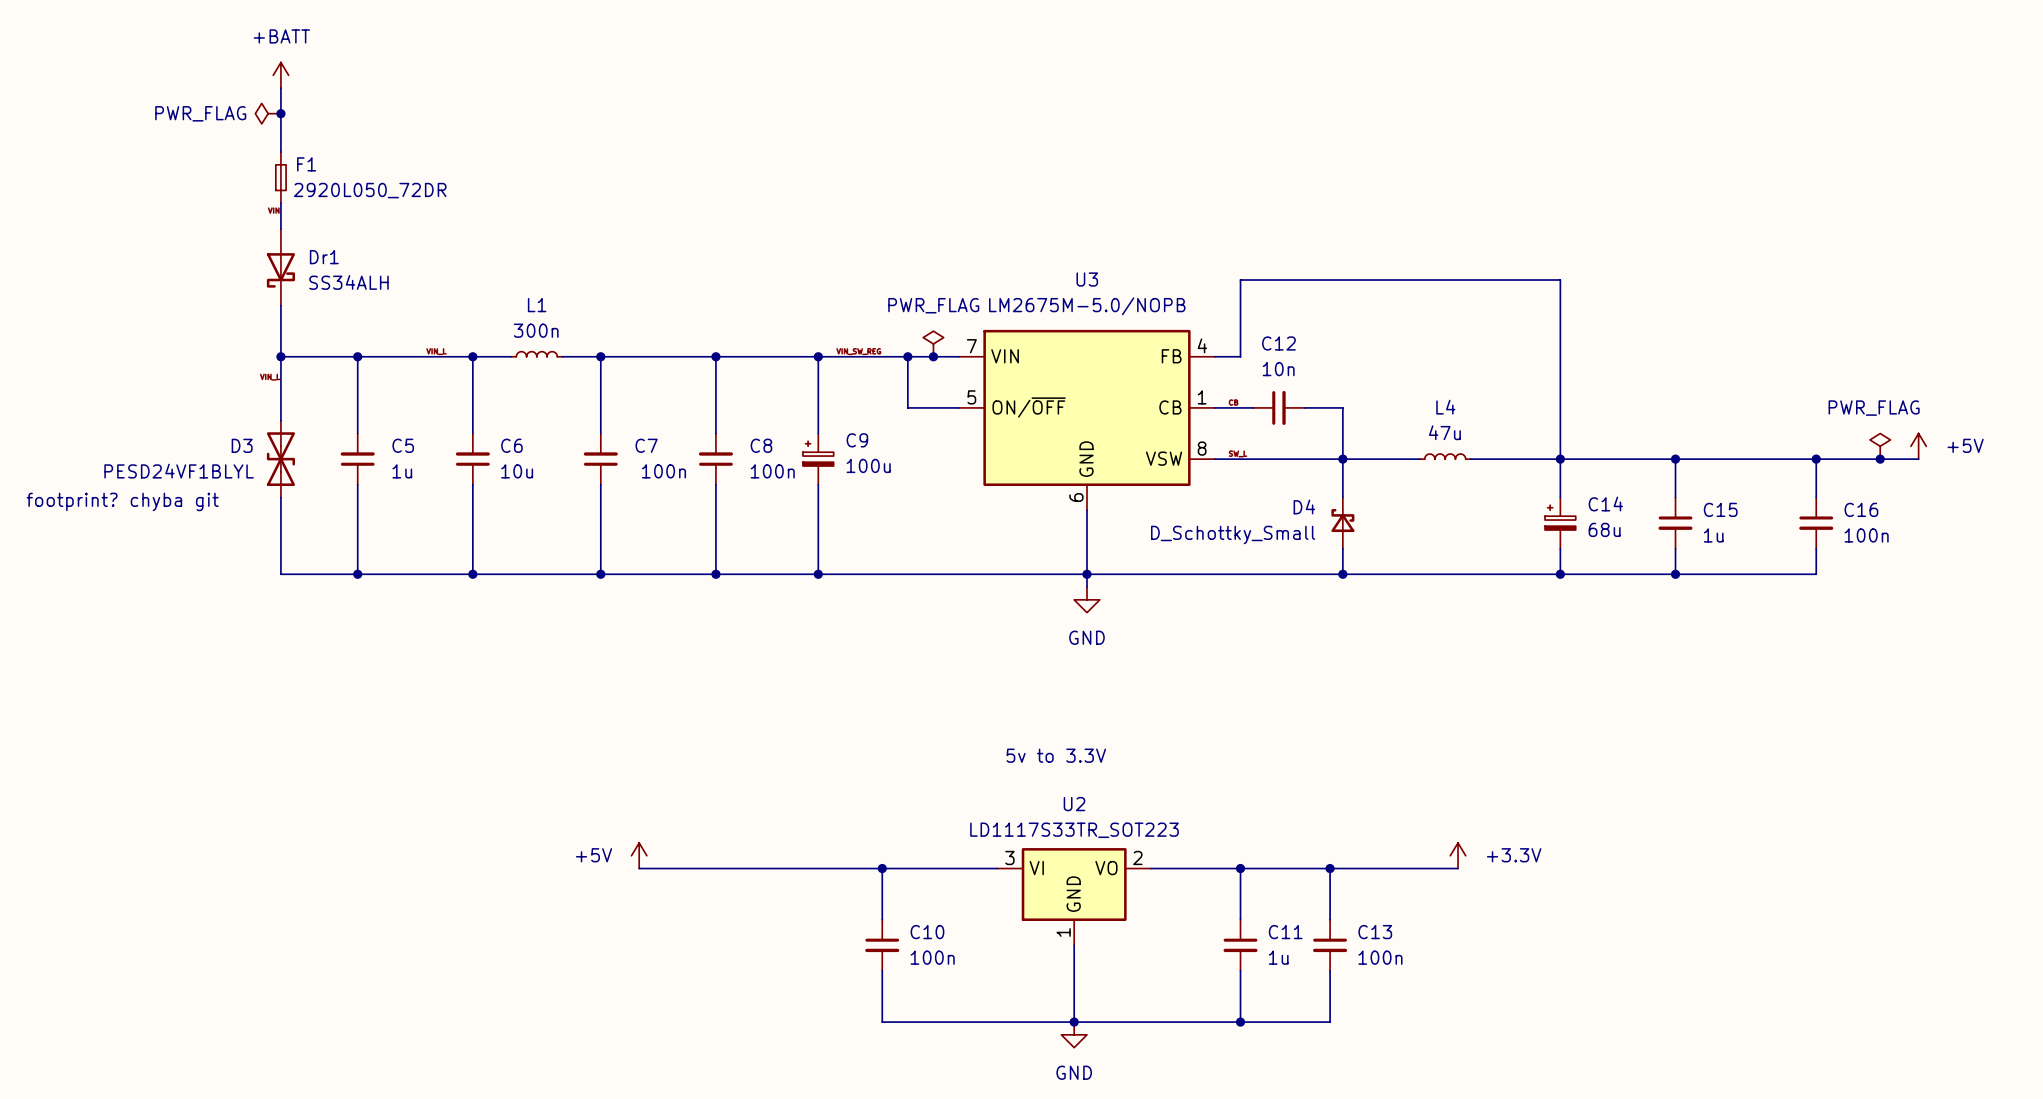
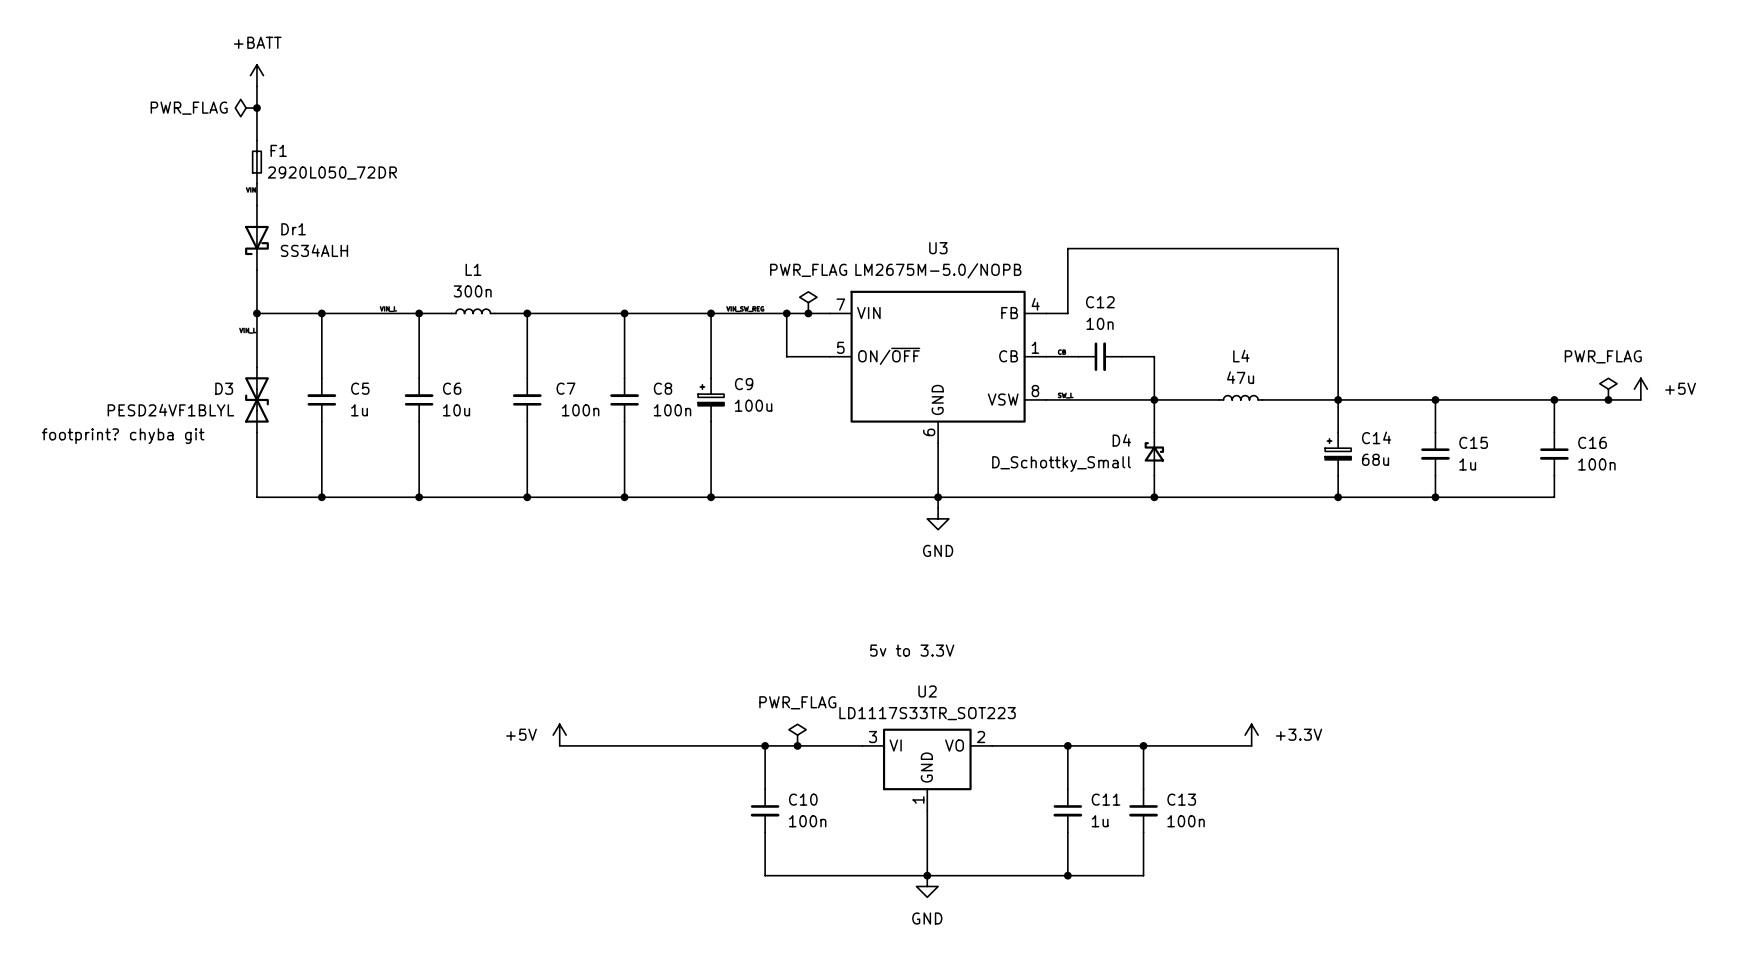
power symbol: none -> PWR_FLAG (797, 735)
junction: none -> (797, 745)

